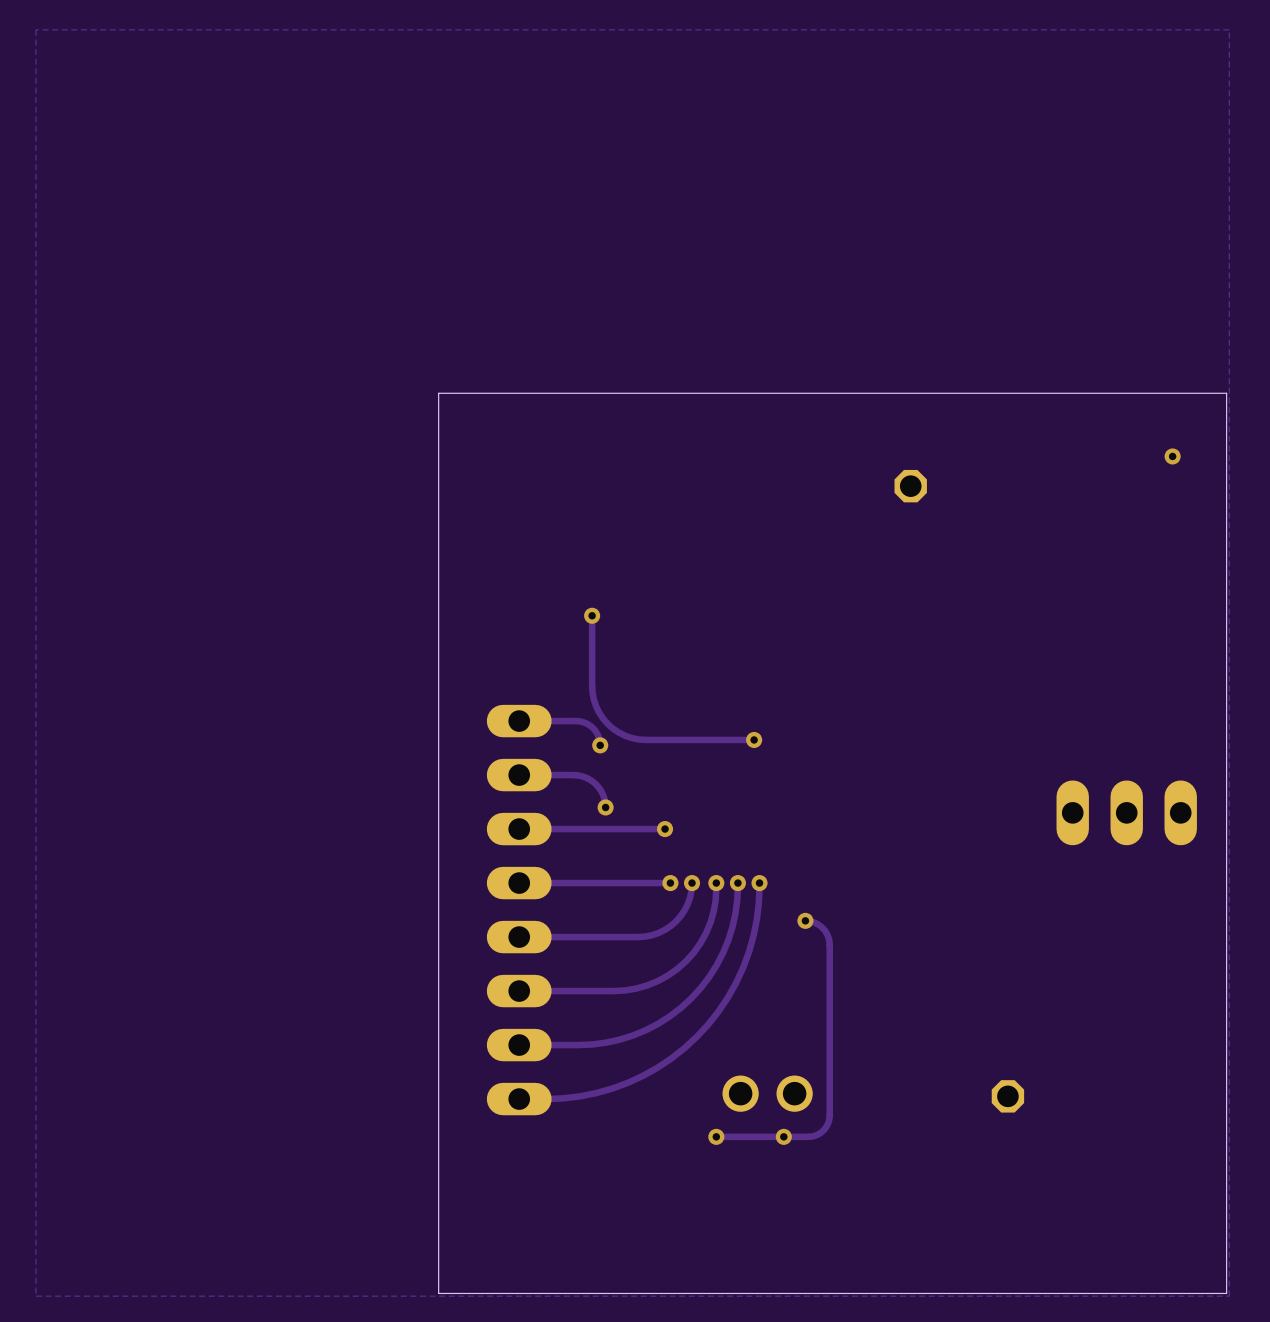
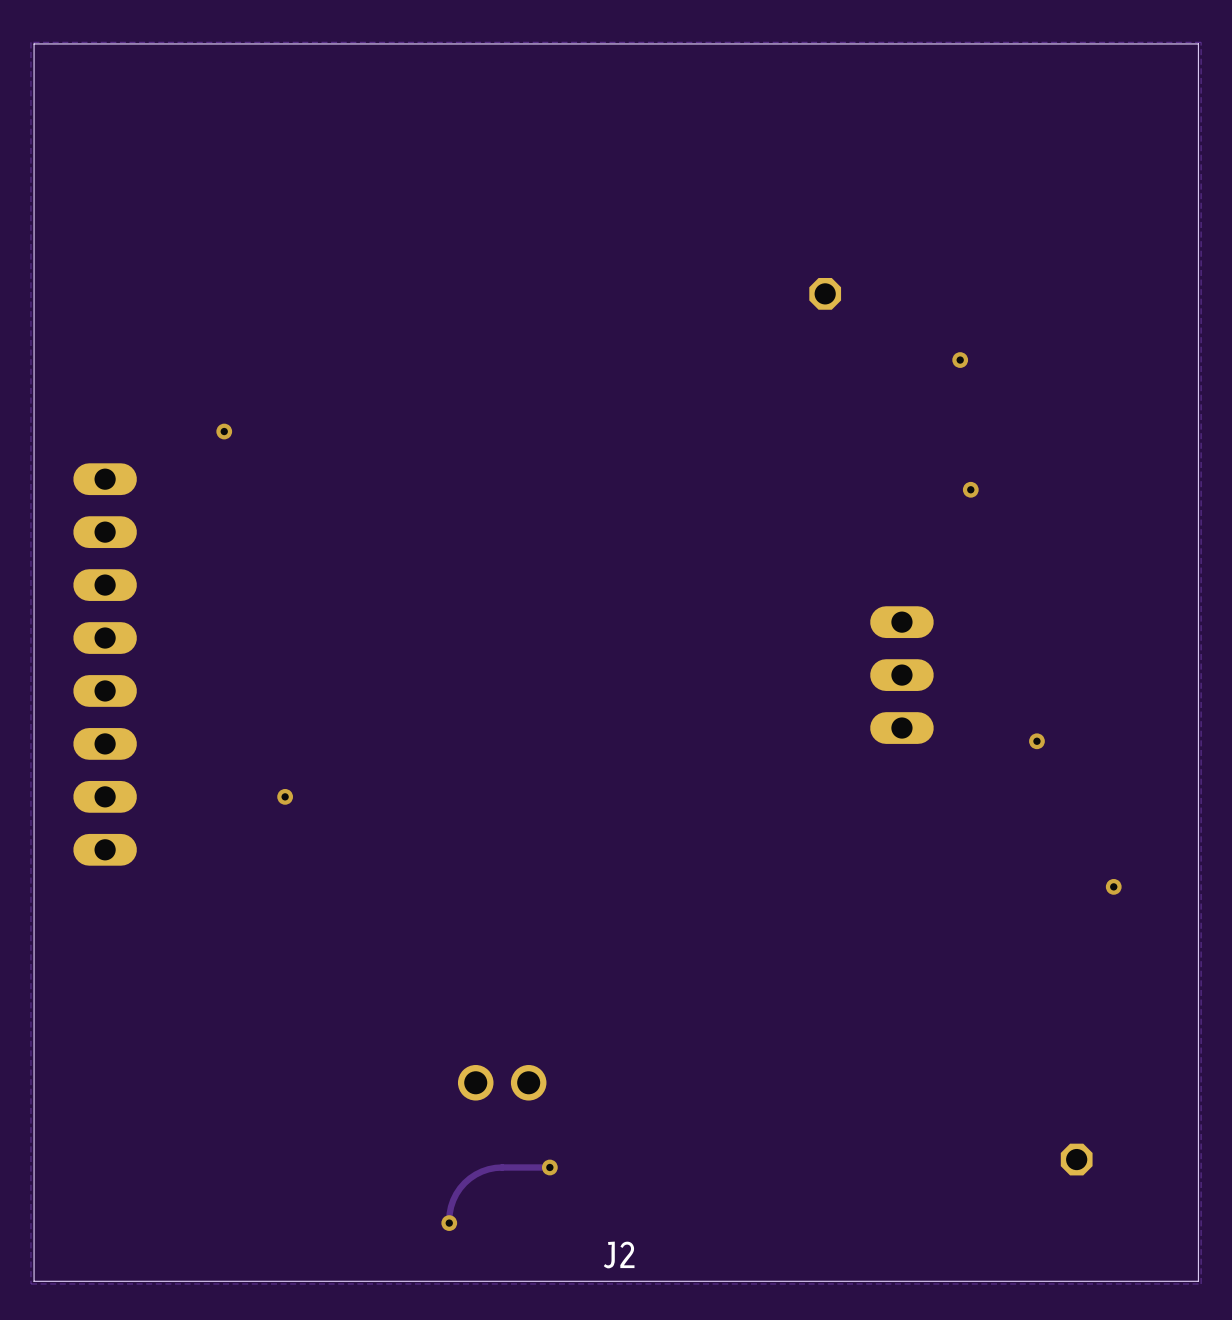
via: none -> (960, 360)
board edge: (1226, 393) (438, 393) (438, 1293) -> (1198, 398) (1198, 43) (34, 43) (34, 1281) (425, 1281)
via: none -> (224, 431)
via: (1172, 456) -> none
part position: (910, 486) -> (825, 293)
via: none -> (970, 489)
track: (592, 615) (592, 693) (599, 712) (613, 728) (625, 735) (639, 739) (754, 739) -> none
via: (592, 615) -> none
track: (519, 721) (582, 721) (595, 730) (600, 745) -> none
via: (754, 739) -> none
via: none -> (1036, 741)
via: (600, 745) -> none
track: (519, 775) (573, 775) (585, 777) (592, 781) (601, 791) (605, 807) -> none
via: none -> (285, 796)
via: (605, 807) -> none
part rotation: 0° (1126, 812) -> 90° clockwise (901, 675)
part position: (1126, 812) -> (901, 675)
track: (665, 829) (519, 829) -> none
via: (665, 829) -> none
track: (670, 883) (519, 883) -> none
via: (670, 883) -> none
track: (692, 883) (687, 903) (680, 915) (665, 929) (652, 935) (638, 937) (519, 937) -> none
via: (692, 883) -> none
track: (716, 883) (713, 911) (700, 943) (686, 961) (658, 980) (625, 990) (519, 991) -> none
via: (716, 883) -> none
track: (737, 883) (735, 913) (723, 953) (700, 988) (670, 1016) (633, 1035) (606, 1042) (578, 1045) (519, 1045) -> none
via: (737, 883) -> none
track: (759, 883) (756, 919) (743, 967) (718, 1011) (684, 1047) (657, 1067) (612, 1088) (562, 1098) (519, 1099) -> none
via: (759, 883) -> none
via: none -> (1113, 886)
part position: (519, 910) -> (105, 664)
track: (805, 920) (820, 925) (826, 933) (829, 941) (829, 1115) (828, 1123) (821, 1132) (810, 1136) (716, 1136) -> none
via: (805, 920) -> none
part position: (767, 1093) -> (502, 1082)
part position: (1007, 1096) -> (1076, 1159)
via: (716, 1136) -> none
via: (783, 1136) -> none
track: none -> (549, 1167) (495, 1167) (475, 1174) (464, 1182) (456, 1193) (451, 1206) (449, 1223)
via: none -> (549, 1167)
via: none -> (449, 1223)
J2: none -> (619, 1254)

